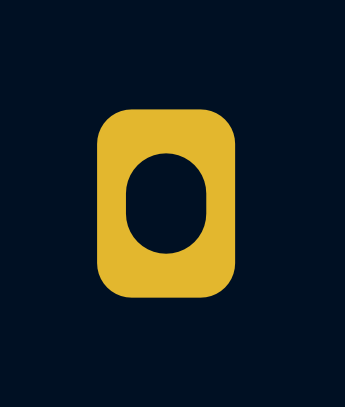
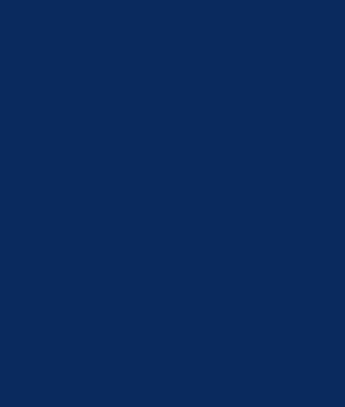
part: (166, 203) -> none

